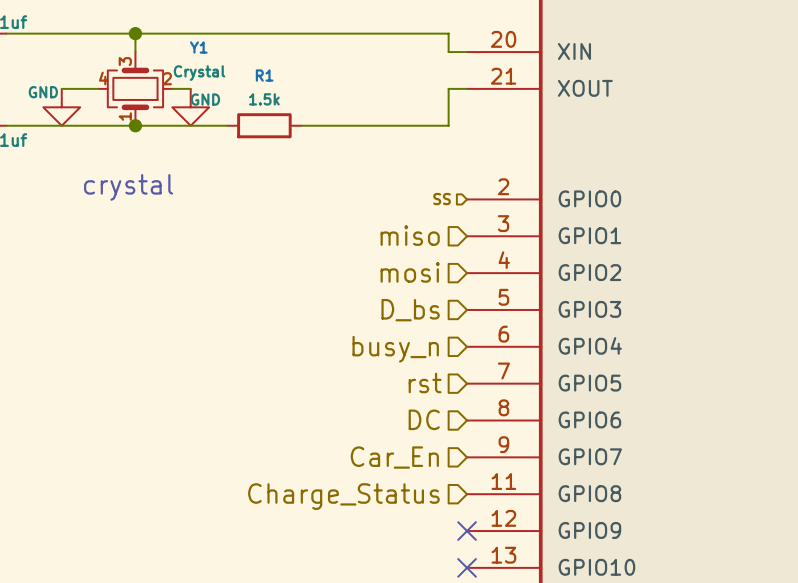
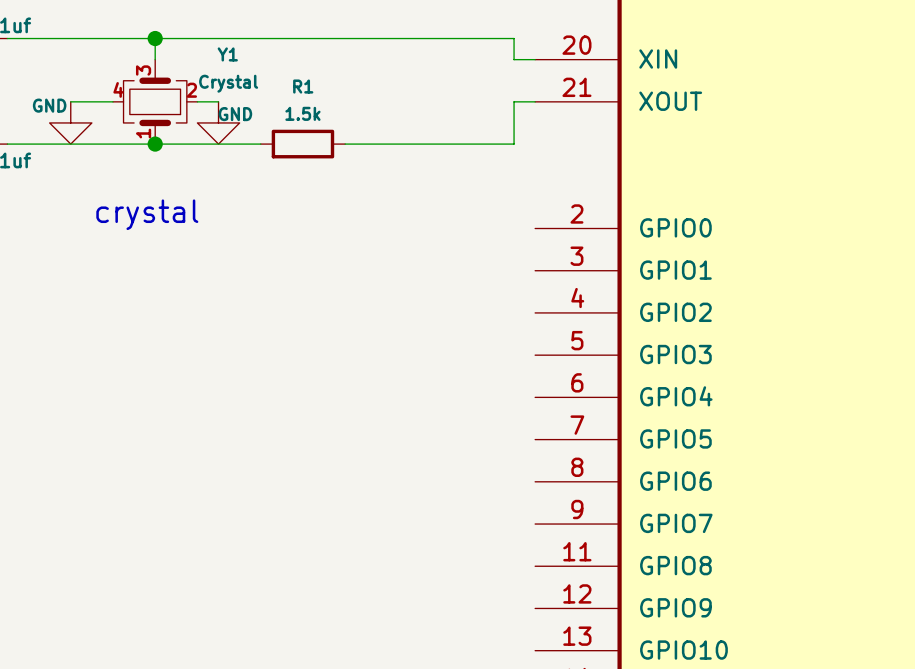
hierarchical label: SS (442, 199) -> none
hierarchical label: miso (410, 235) -> none
hierarchical label: mosi (410, 272) -> none
hierarchical label: D_bs (410, 310) -> none
hierarchical label: busy_n (395, 349) -> none
hierarchical label: rst (425, 382) -> none
hierarchical label: DC (424, 419) -> none
hierarchical label: Car_En (394, 457) -> none
hierarchical label: Charge_Status (343, 496) -> none
no-connect mark: (467, 531) -> none
no-connect mark: (467, 567) -> none

